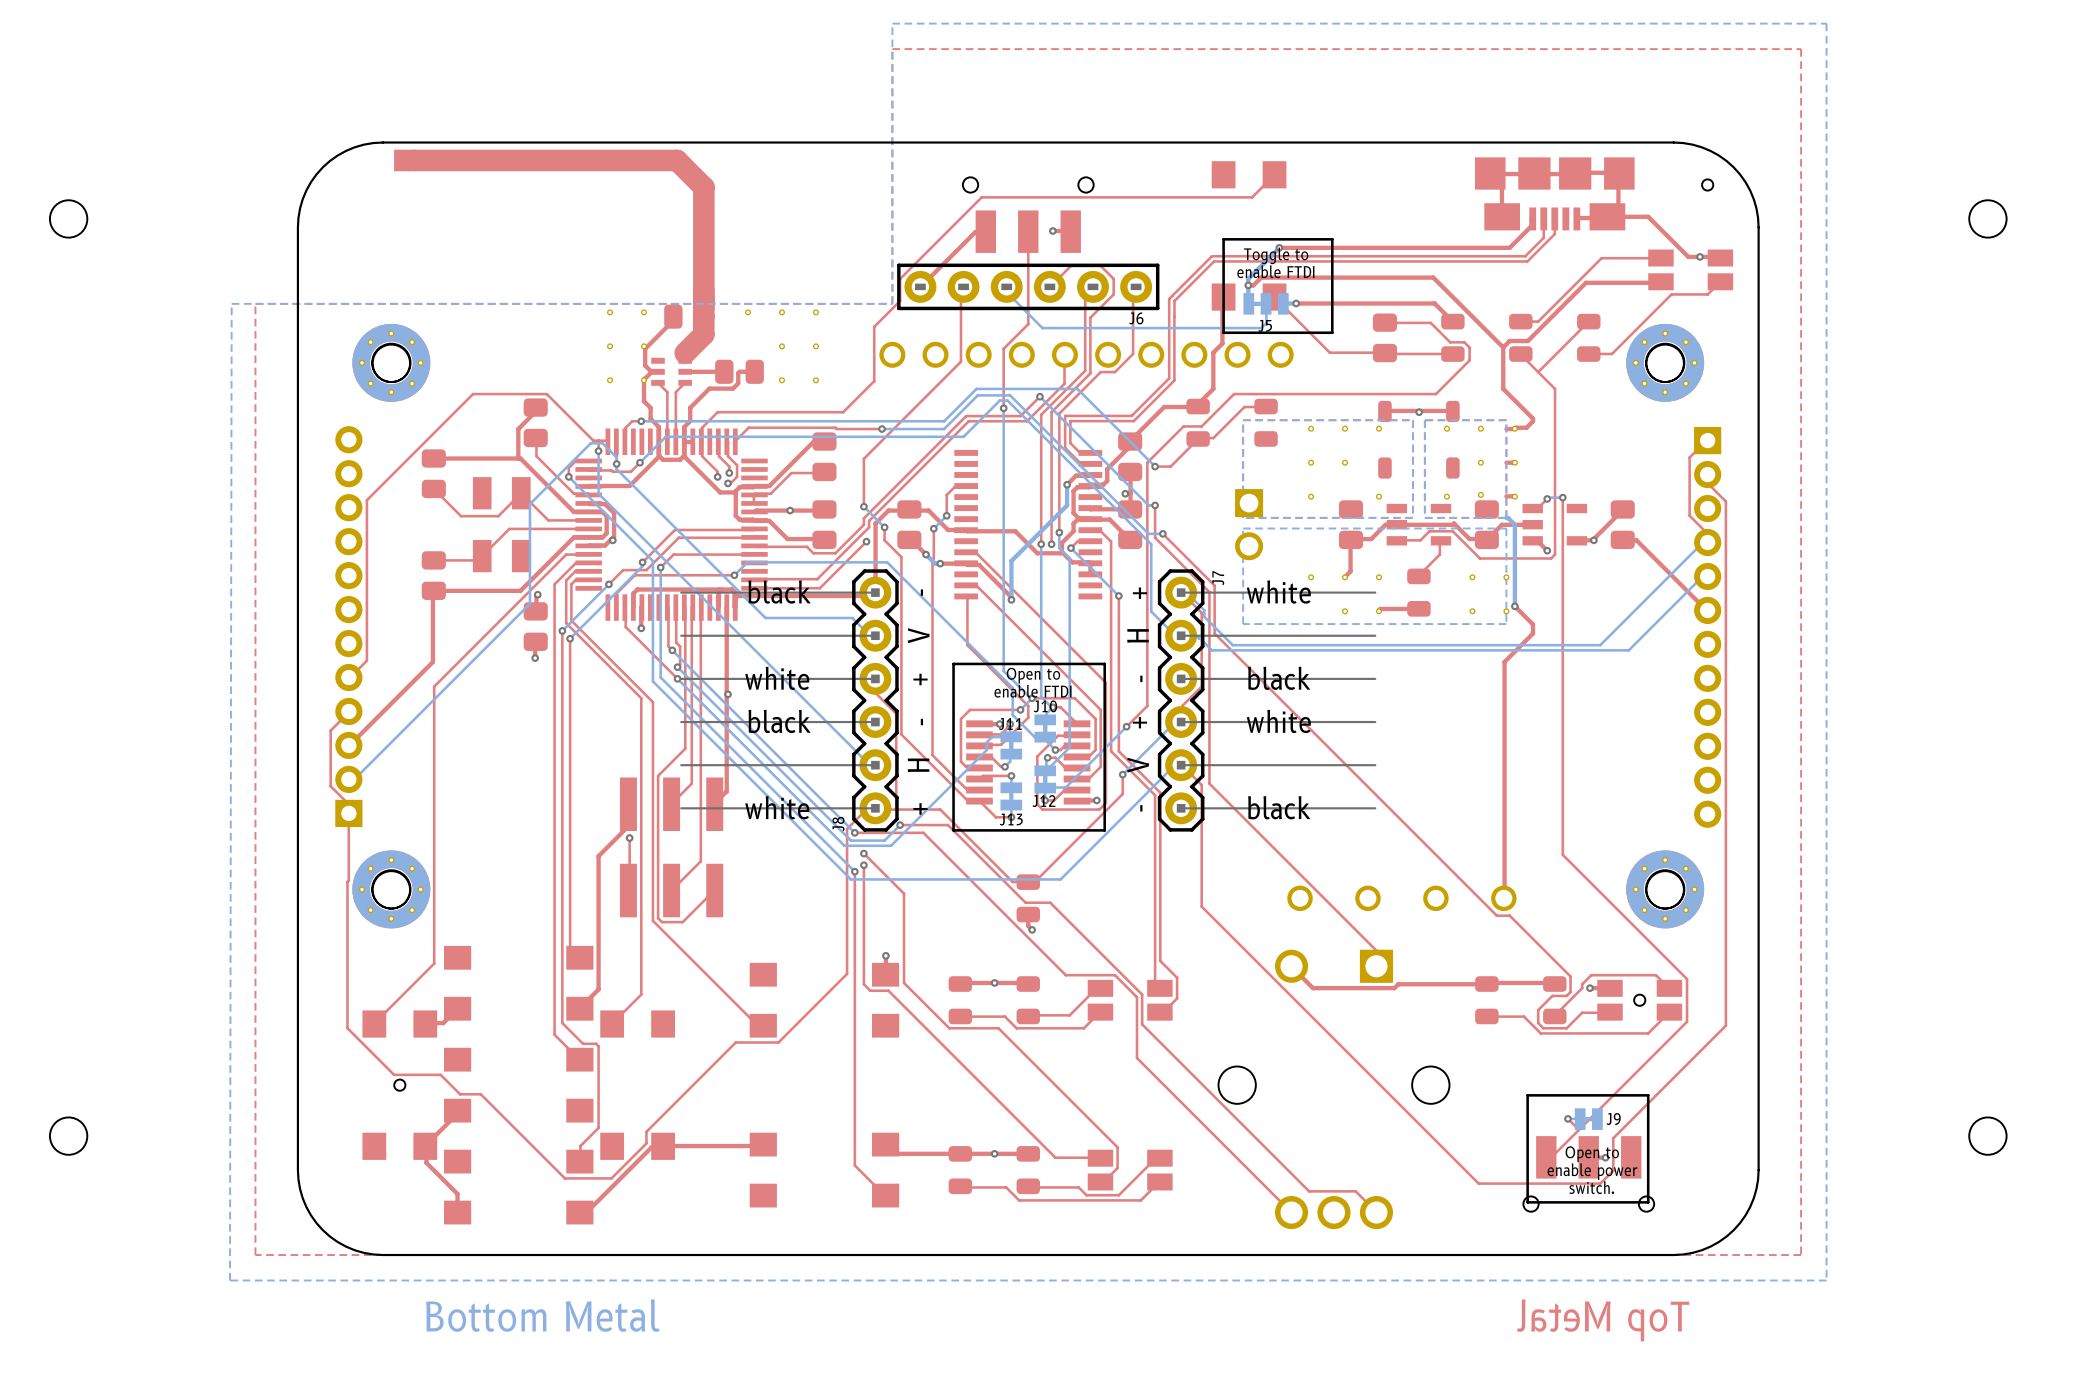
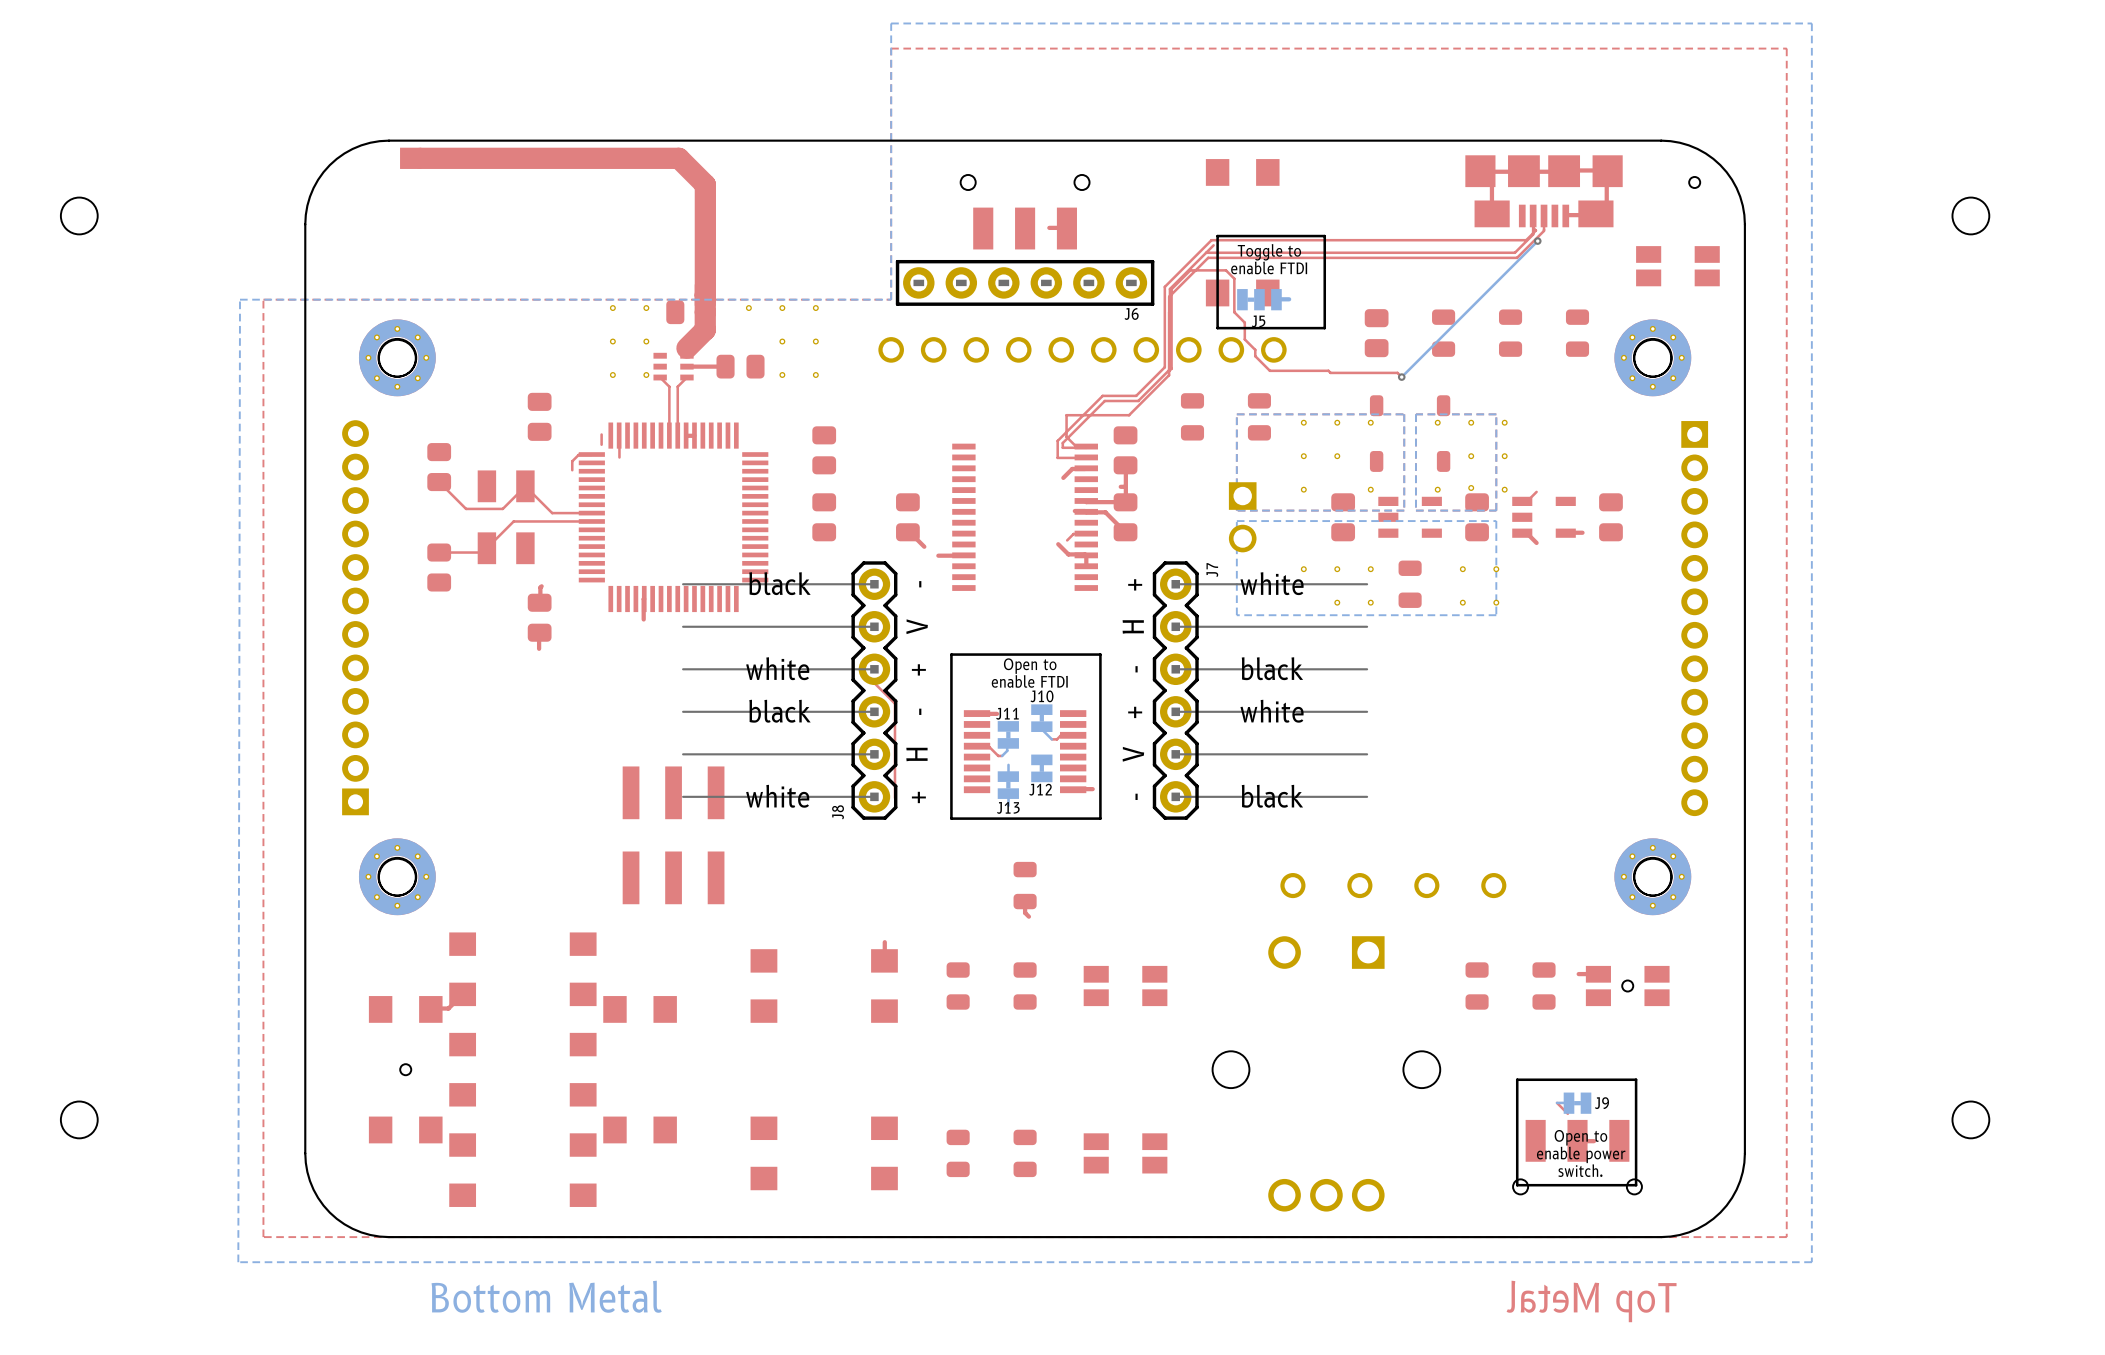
top track: (1274, 174) (1252, 197) (981, 197) (900, 278) (900, 300) (874, 326) (874, 381) (843, 412) (717, 412) (702, 427) (701, 441) (702, 456) (717, 471) (717, 476) -> none
top track: (1607, 216) (1648, 216) (1688, 256) (1720, 258) -> none
top track: (1532, 218) (1531, 225) (1509, 247) (1279, 247) -> none
top track: none -> (1533, 227) (1535, 230) (1526, 240) (1211, 240) (1164, 286) (1164, 367) (1136, 395) (1102, 395) (1057, 440) (1057, 457) (1086, 457)
top track: (985, 231) (975, 232) (920, 286) -> none
top track: (1028, 231) (1028, 324) (1003, 348) (1003, 408) -> none
via: (1052, 231) -> none
bottom track: none -> (1537, 241) (1401, 377)
via: none -> (1537, 241)
bottom track: (1279, 247) (1248, 278) (1248, 303) -> none
via: (1279, 247) -> none
via: (1699, 256) -> none
top track: (1660, 258) (1601, 258) (1538, 321) (1520, 321) -> none
top track: (1660, 281) (1586, 282) (1527, 341) (1509, 341) (1503, 347) -> none
top track: (1720, 281) (1707, 294) (1671, 294) (1611, 353) (1588, 354) -> none
top track: (1248, 285) (1253, 285) (1261, 277) (1433, 277) (1503, 347) -> none
via: (1248, 285) -> none
top track: (963, 286) (960, 290) (960, 361) (863, 458) (863, 506) -> none
bottom track: (1006, 286) (1007, 293) (1042, 328) (1261, 328) (1266, 322) (1266, 303) -> none
top track: (1049, 286) (1070, 265) (1100, 265) (1113, 278) (1113, 294) (1090, 317) (1090, 373) (1051, 412) (1051, 544) -> none
top track: (1092, 286) (1085, 295) (1085, 370) (1041, 414) (1041, 544) -> none
top track: (1136, 286) (1133, 290) (1133, 353) (1114, 372) (1100, 372) (1059, 413) (1059, 532) -> none
top track: (1175, 293) (1169, 298) (1169, 378) (1131, 415) (1065, 415) (1065, 448) (1081, 463) (1090, 463) -> (1169, 289) (1169, 369) (1138, 400) (1104, 400) (1062, 443) (1062, 447) (1087, 447)
top track: (1223, 297) (1222, 343) (1213, 352) (1213, 388) (1197, 404) (1197, 407) (1164, 407) (1130, 440) (1129, 447) (1107, 469) (1107, 480) (1103, 484) (1077, 487) (1073, 491) (1073, 513) (1078, 518) (1073, 523) (1073, 531) (1061, 542) (1060, 553) (1037, 553) (1015, 531) (966, 530) -> none
top track: (1274, 297) (1329, 352) (1452, 353) -> none
top track: (1296, 303) (1434, 303) (1452, 321) -> none
via: (1296, 303) -> none
top track: (673, 316) (672, 321) (645, 348) (645, 365) (651, 372) -> none
top track: (1588, 321) (1538, 372) -> none
top track: (1384, 322) (1430, 322) (1450, 342) (1464, 342) (1469, 347) (1469, 360) (1435, 394) (1234, 394) (1201, 426) (1183, 426) (1147, 462) (1147, 706) (1126, 726) -> none
top track: (1503, 347) (1503, 388) (1533, 418) (1533, 421) (1526, 427) (1506, 429) -> none
top track: (1064, 354) (1064, 383) (1026, 421) (968, 421) (869, 520) (869, 527) (817, 579) (754, 579) -> none
top track: (1520, 354) (1555, 388) (1555, 554) (1551, 558) (1479, 558) (1452, 531) (1429, 531) (1420, 540) (1396, 540) -> none
top track: (754, 371) (739, 371) (738, 383) (732, 388) (709, 388) (690, 407) (690, 421) (684, 427) (684, 455) (680, 459) (663, 459) (658, 455) (658, 427) (650, 418) (650, 407) (643, 401) (643, 380) (651, 372) -> none
top track: none -> (1168, 370) (1171, 368) (1171, 289) (1190, 270) (1225, 270) (1234, 278) (1234, 312) (1244, 322) (1244, 339) (1255, 349) (1255, 356) (1269, 370) (1397, 372) (1401, 377)
top track: (1039, 396) (1020, 416) (966, 416) (863, 518) (863, 524) (835, 553) (813, 553) (806, 546) (754, 545) -> none
bottom track: (1039, 396) (1148, 505) (1155, 505) -> none
via: (1039, 396) -> none
top track: (1266, 406) (1244, 407) (1213, 438) (1199, 438) (1170, 466) (1155, 466) -> none
top track: (535, 407) (535, 412) (518, 429) (518, 458) -> none
bottom track: (1003, 408) (1003, 671) (1032, 698) (1020, 709) -> none
via: (1003, 408) -> none
top track: (1452, 411) (1384, 411) -> none
via position: (1419, 412) -> (1401, 377)
top track: (641, 421) (632, 421) (625, 427) (624, 441) -> none
bottom track: (641, 421) (944, 421) (976, 388) (1077, 388) (1155, 466) -> none
via: (641, 421) -> none
top track: (882, 429) (748, 427) (735, 441) -> none
bottom track: (882, 429) (944, 429) (977, 395) (1010, 395) (1148, 533) (1162, 533) -> none
via: (882, 429) -> none
top track: (535, 437) (536, 456) (573, 493) (588, 494) -> none
top track: (1707, 440) (1689, 457) (1689, 515) (1706, 532) (1707, 542) -> none
top track: (607, 441) (593, 440) (546, 394) (473, 394) (366, 500) (366, 660) (348, 677) -> none
top track: (718, 441) (718, 456) (729, 466) (729, 473) -> none
top track: (726, 441) (728, 456) (737, 465) (737, 476) (730, 483) (728, 483) -> none
top track: (824, 441) (813, 441) (769, 485) (739, 487) (735, 491) (735, 515) (739, 519) (769, 520) (787, 539) (824, 539) -> none
bottom track: (598, 451) (598, 493) (869, 764) (875, 765) -> none
via: (598, 451) -> none
top track: (659, 456) (629, 485) (588, 486) -> none
top track: (683, 456) (720, 492) (735, 492) -> none
top track: (433, 458) (520, 458) (573, 511) (602, 511) (606, 516) (606, 533) (602, 537) (573, 537) (520, 590) (433, 590) (432, 662) (348, 745) -> none
top track: (640, 462) (630, 471) (588, 469) -> none
bottom track: (640, 462) (665, 436) (963, 436) (999, 400) (1007, 400) (1151, 544) (1151, 611) (1174, 634) (1196, 636) (1212, 650) (1628, 650) (1702, 576) (1707, 576) -> none
via: (640, 462) -> none
top track: (1514, 462) (1506, 462) -> none
via: (616, 463) -> none
via: (1155, 466) -> none
top track: (824, 471) (791, 473) (770, 493) (755, 493) (754, 503) -> none
via: (729, 473) -> none
top track: (1707, 474) (1707, 483) (1725, 501) (1725, 1025) (1613, 1138) (1613, 1170) (1600, 1183) (1478, 1183) (1201, 906) (1201, 784) (1181, 765) -> none
bottom track: (568, 476) (652, 561) (652, 681) (850, 879) (1060, 879) (1174, 765) (1181, 765) -> none
via: (568, 476) -> none
via: (717, 476) -> none
via: (728, 483) -> none
bottom track: (1067, 484) (1067, 505) (1011, 561) (1011, 599) -> none
via: (1067, 484) -> none
top track: (966, 486) (954, 487) (946, 495) (946, 515) -> none
via: (1125, 493) -> none
top track: (1506, 496) (1514, 496) -> none
top track: (1562, 497) (1562, 854) (1687, 979) (1687, 1021) (1552, 1156) (1546, 1157) -> none
bottom track: (1562, 497) (1547, 498) -> none
via: (1562, 497) -> none
via: (1547, 498) -> none
top track: (588, 503) (605, 504) (614, 513) (614, 536) (605, 545) (588, 545) -> none
top track: (1155, 505) (1155, 537) (1209, 592) (1209, 783) (1376, 950) (1376, 966) -> none
via: (1155, 505) -> none
bottom track: (863, 506) (884, 527) -> none
via: (863, 506) -> none
top track: (824, 509) (754, 511) -> none
top track: (1622, 509) (1592, 540) -> none
via: (790, 510) -> none
bottom track: (946, 515) (933, 528) -> none
via: (946, 515) -> none
bottom track: (1506, 517) (1514, 524) (1514, 606) -> none
top track: (1532, 524) (1501, 524) (1486, 539) (1469, 539) (1454, 523) (1385, 524) (1371, 539) (1350, 539) (1350, 571) (1345, 577) -> none
top track: (884, 527) (884, 540) (901, 557) (901, 734) (967, 800) (979, 800) (995, 817) (1011, 817) -> none
via: (884, 527) -> none
top track: (754, 528) (674, 529) (642, 562) -> none
top track: (933, 528) (932, 755) (966, 788) (979, 790) -> none
via: (933, 528) -> none
top track: (966, 529) (948, 529) (928, 510) (888, 510) (875, 523) (875, 590) (871, 595) (735, 595) (735, 607) (734, 592) (731, 589) (721, 589) (718, 592) (718, 607) -> none
top track: (1090, 530) (1100, 531) (1111, 541) (1111, 751) (1155, 795) (1155, 984) (1159, 988) -> none
bottom track: (1059, 532) (1059, 548) (1069, 558) (1069, 747) (1050, 766) (1046, 766) (1045, 770) (1047, 757) -> none
via: (1059, 532) -> none
top track: (1162, 533) (1214, 585) (1214, 633) (1496, 915) (1509, 915) (1570, 976) (1570, 992) (1566, 995) (1552, 995) (1538, 1010) (1538, 1023) (1543, 1028) (1566, 1028) (1582, 1012) (1610, 1012) -> none
via: (1162, 533) -> none
top track: (754, 537) (678, 537) (646, 570) (623, 570) (608, 584) -> none
top track: (1622, 539) (1636, 540) (1707, 610) -> none
via: (612, 540) -> none
top track: (1441, 540) (1439, 554) (1418, 576) -> none
via: (1593, 540) -> none
top track: (866, 541) (819, 588) (754, 588) -> none
via: (866, 541) -> none
bottom track: (1707, 542) (1702, 542) (1600, 645) (1232, 645) (1204, 616) (1204, 610) (1187, 593) (1181, 592) -> none
bottom track: (1041, 544) (1041, 696) (1052, 707) (1046, 713) (1045, 719) -> none
via: (1041, 544) -> none
via: (1051, 544) -> none
bottom track: (1070, 548) (1118, 595) -> none
via: (1070, 548) -> none
via: (1547, 550) -> none
top track: (966, 552) (976, 553) (1105, 682) (1105, 803) (1099, 809) (1042, 809) (1037, 804) (1037, 756) (1058, 735) (1077, 734) -> none
top track: (588, 554) (566, 554) (434, 686) (434, 963) (374, 1024) -> none
top track: (754, 554) (673, 554) (660, 567) -> none
bottom track: (926, 554) (935, 563) (940, 563) -> none
via: (926, 554) -> none
top track: (588, 562) (575, 563) (554, 584) (554, 1034) (579, 1059) -> none
bottom track: (642, 562) (642, 566) (570, 638) -> none
via: (642, 562) -> none
via: (940, 563) -> none
top track: (966, 563) (979, 564) (1011, 597) (1011, 599) -> none
bottom track: (660, 567) (660, 677) (854, 871) -> none
via: (660, 567) -> none
top track: (588, 571) (575, 571) (566, 580) (566, 623) (641, 698) (641, 994) (612, 1024) -> none
top track: (734, 575) (634, 575) (616, 593) (616, 607) -> none
bottom track: (734, 575) (747, 562) (887, 562) (1012, 687) (1012, 715) (1034, 737) (1045, 737) -> none
via: (734, 575) -> none
top track: (588, 579) (575, 580) (571, 584) (571, 620) (652, 702) (652, 920) (757, 1025) (763, 1025) -> none
bottom track: (608, 584) (562, 630) -> none
via: (608, 584) -> none
top track: (966, 585) (976, 585) (1100, 709) (1100, 766) (1089, 778) (1077, 779) -> none
top track: (720, 590) (637, 589) (633, 593) (633, 607) -> none
top track: (1181, 592) (1201, 612) (1201, 686) (1182, 706) (1181, 722) -> none
via: (537, 594) -> none
top track: (1118, 595) (1118, 751) (1160, 792) (1160, 960) (1177, 977) (1177, 998) (1164, 1011) (1159, 1012) -> none
via: (1118, 595) -> none
top track: (966, 596) (967, 645) (1028, 706) (1028, 717) (1001, 744) (979, 745) -> none
via: (1011, 599) -> none
top track: (1514, 606) (1533, 624) (1533, 633) (1504, 662) (1503, 898) -> none
via: (1514, 606) -> none
top track: (624, 607) (625, 627) (677, 678) -> none
top track: (667, 607) (668, 646) (672, 650) -> none
top track: (675, 607) (676, 642) (680, 646) (680, 664) (677, 667) -> none
top track: (684, 607) (685, 748) (658, 775) (658, 918) (662, 922) (682, 922) (714, 890) -> none
top track: (692, 607) (691, 783) (671, 804) -> none
top track: (701, 607) (700, 861) (671, 890) -> none
top track: (726, 607) (726, 791) (714, 804) -> none
top track: (1418, 608) (1380, 608) (1379, 611) -> none
via: (641, 628) -> none
top track: (562, 630) (562, 1023) (583, 1043) (595, 1043) (598, 1046) (598, 1127) (580, 1146) (579, 1161) -> none
via: (562, 630) -> none
bottom track: (875, 635) (869, 634) (852, 618) (765, 618) (616, 469) (616, 457) (602, 443) (590, 443) (529, 504) (529, 603) (355, 778) (348, 779) -> none
top track: (570, 638) (570, 948) (579, 957) -> none
via: (570, 638) -> none
bottom track: (672, 650) (854, 832) -> none
via: (672, 650) -> none
via: (535, 658) -> none
bottom track: (677, 667) (850, 840) (884, 840) (900, 825) -> none
via: (677, 667) -> none
bottom track: (677, 678) (844, 845) (891, 845) (986, 750) (986, 742) (992, 737) (1011, 736) (1010, 724) -> none
via: (677, 678) -> none
via: (728, 694) -> none
top track: (1032, 698) (1074, 698) (1095, 718) (1095, 750) (1089, 756) (1077, 756) -> none
via: (1032, 698) -> none
top track: (1052, 707) (1060, 707) (1077, 723) -> none
via: (1052, 707) -> none
top track: (1020, 709) (970, 709) (960, 718) (960, 761) (966, 766) (979, 767) -> none
via: (1020, 709) -> none
top track: (348, 711) (330, 730) (330, 786) (348, 804) (348, 813) -> none
bottom track: (1181, 722) (1174, 722) (1122, 774) -> none
via: (999, 724) -> none
top track: (1010, 724) (1001, 734) (979, 734) -> none
via: (1010, 724) -> none
bottom track: (1126, 726) (1065, 787) (1045, 788) (1045, 800) -> none
via: (1126, 726) -> none
via: (1055, 750) -> none
top track: (1047, 757) (1055, 757) (1064, 766) (1077, 767) -> none
via: (1047, 757) -> none
via: (1004, 766) -> none
top track: (1122, 774) (1122, 794) (1034, 882) (1012, 882) (940, 809) (866, 809) (847, 828) (847, 973) (778, 1042) (735, 1042) (646, 1131) (646, 1143) (611, 1178) (564, 1178) (480, 1094) (460, 1094) (440, 1074) (394, 1074) (347, 1028) (348, 813) -> none
via: (1122, 774) -> none
top track: (1011, 775) (982, 775) (979, 779) -> none
via: (1011, 775) -> none
top track: (1077, 790) (1064, 790) (1054, 800) (1045, 800) -> none
via: (1045, 800) -> none
via: (1096, 800) -> none
top track: (628, 804) (628, 826) (598, 856) (598, 989) (579, 1008) -> none
via: (1011, 817) -> none
top track: (900, 825) (948, 825) (1025, 902) (1050, 902) (1142, 994) (1142, 1024) (1309, 1191) (1355, 1191) (1376, 1212) -> none
via: (900, 825) -> none
top track: (854, 832) (923, 832) (1065, 975) (1114, 975) (1136, 997) (1136, 1058) (1291, 1212) -> none
via: (854, 832) -> none
top track: (629, 838) (628, 890) -> none
via: (629, 838) -> none
top track: (863, 853) (904, 893) (904, 982) (949, 1028) (998, 1028) (1117, 1147) (1117, 1168) (1104, 1180) (1100, 1181) -> none
via: (863, 853) -> none
top track: (863, 865) (863, 984) (870, 990) (888, 990) (1055, 1157) (1100, 1158) -> none
via: (863, 865) -> none
top track: (854, 871) (854, 1165) (885, 1195) -> none
via: (854, 871) -> none
via: (1032, 929) -> none
via: (885, 955) -> none
top track: (1291, 966) (1313, 988) (1394, 988) (1398, 984) (1554, 984) -> none
via: (994, 982) -> none
top track: (1028, 984) (960, 984) -> none
top track: (1100, 988) (1095, 989) (1069, 1015) (1028, 1016) -> none
via: (1589, 988) -> none
top track: (1669, 988) (1655, 975) (1591, 975) (1582, 984) (1582, 988) (1554, 1016) -> none
top track: (1100, 1012) (1083, 1028) (1016, 1028) (1004, 1016) (960, 1016) -> none
top track: (1669, 1012) (1648, 1033) (1540, 1033) (1523, 1016) (1486, 1016) -> none
top track: (457, 1110) (457, 1113) (425, 1146) (426, 1162) (457, 1193) (457, 1212) -> none
via: (1567, 1118) -> none
top track: (763, 1144) (663, 1146) -> none
top track: (885, 1144) (894, 1153) (1028, 1153) -> none
top track: (663, 1146) (651, 1147) (586, 1212) (579, 1212) -> none
via: (994, 1153) -> none
via: (1605, 1157) -> none
top track: (1159, 1158) (1155, 1158) (1118, 1195) (1086, 1195) (1078, 1187) (1028, 1186) -> none
top track: (1159, 1181) (1140, 1200) (1019, 1200) (1006, 1187) (960, 1186) -> none

